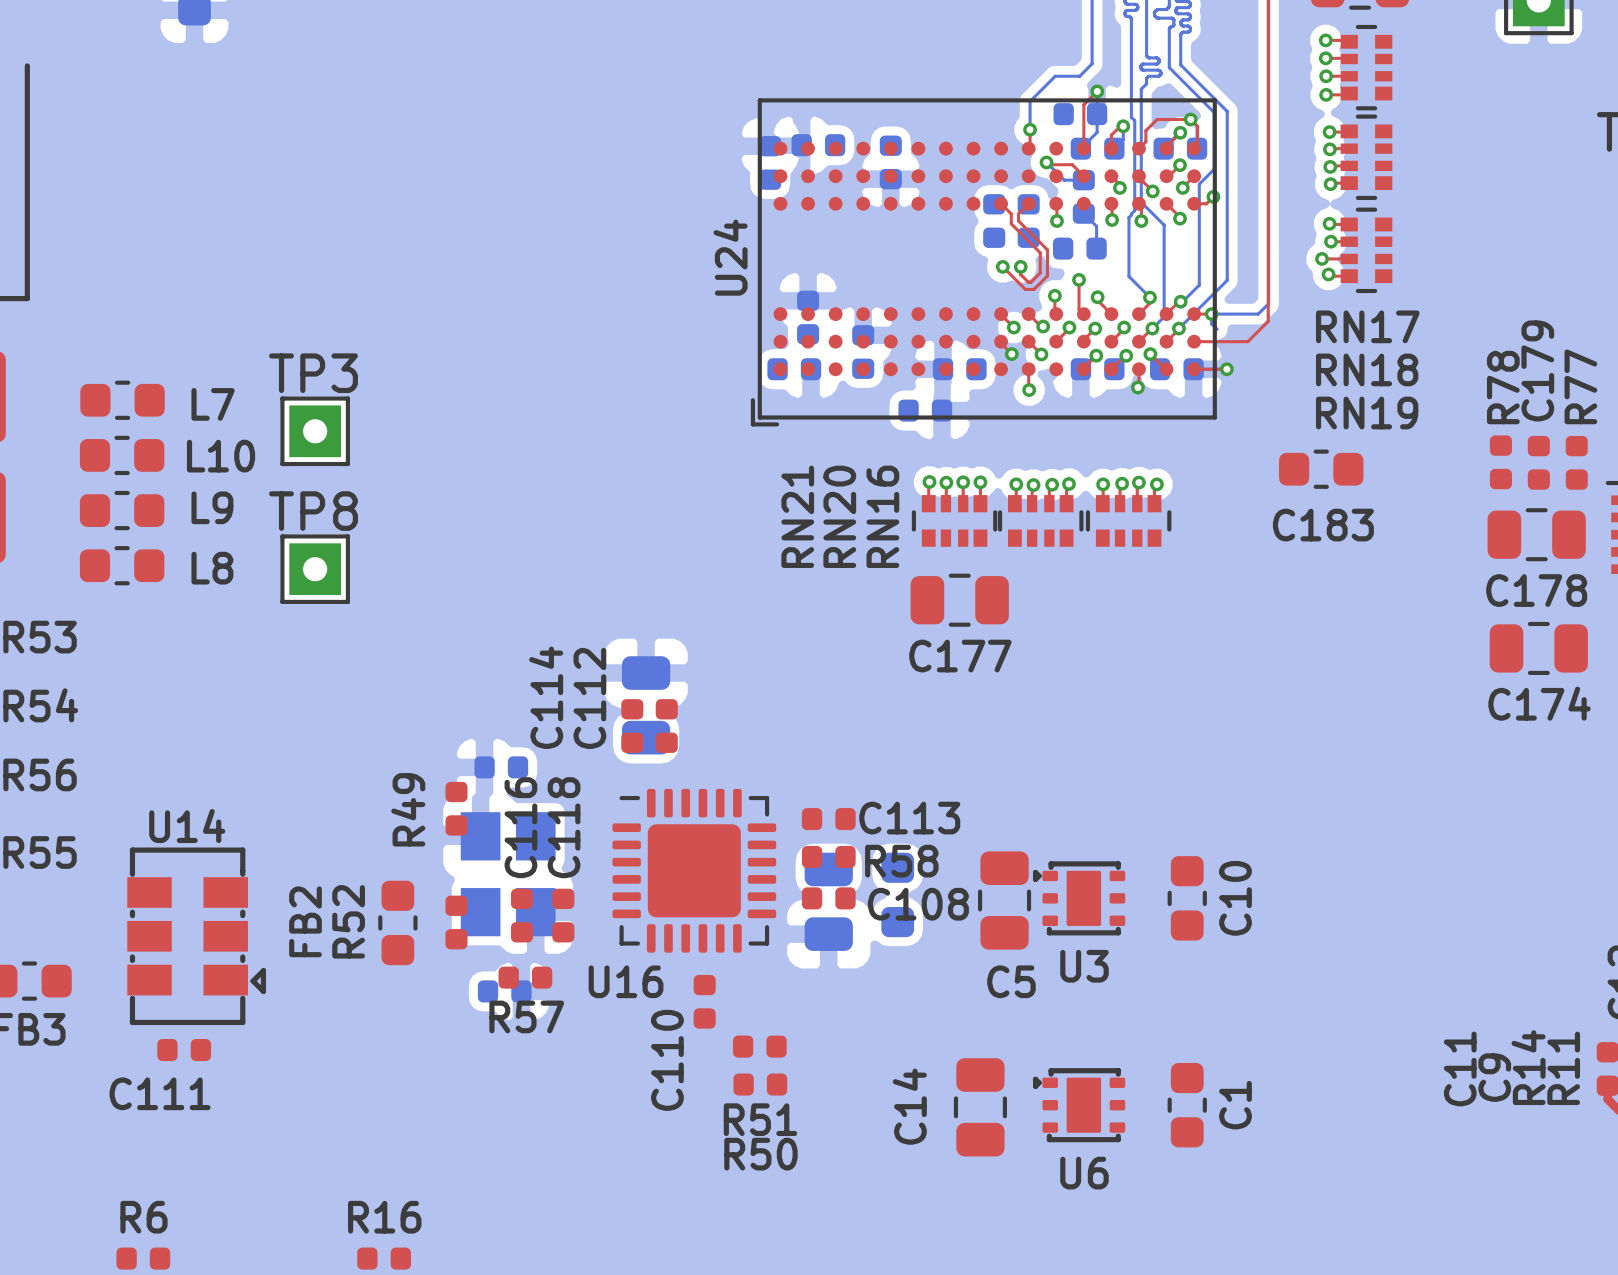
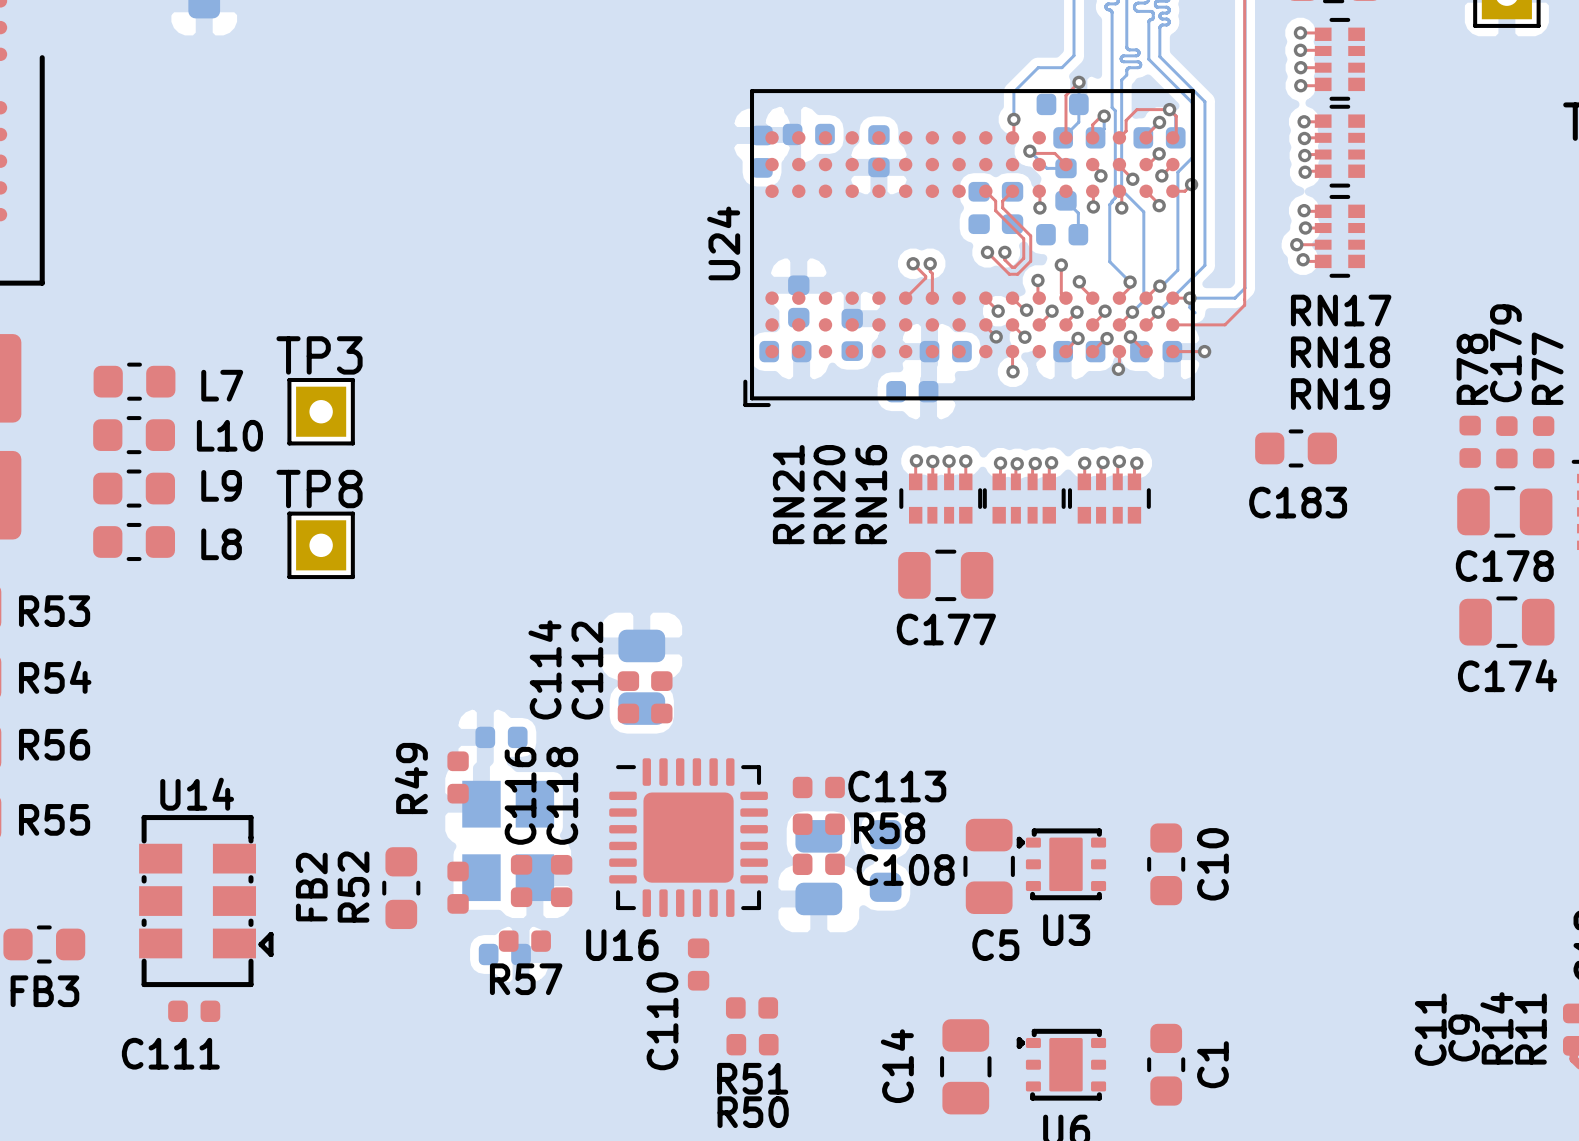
top track: none -> (913, 263) (925, 278) (905, 298)
via: none -> (913, 263)
top track: none -> (930, 263) (930, 271) (932, 273) (932, 298)
via: none -> (930, 263)

